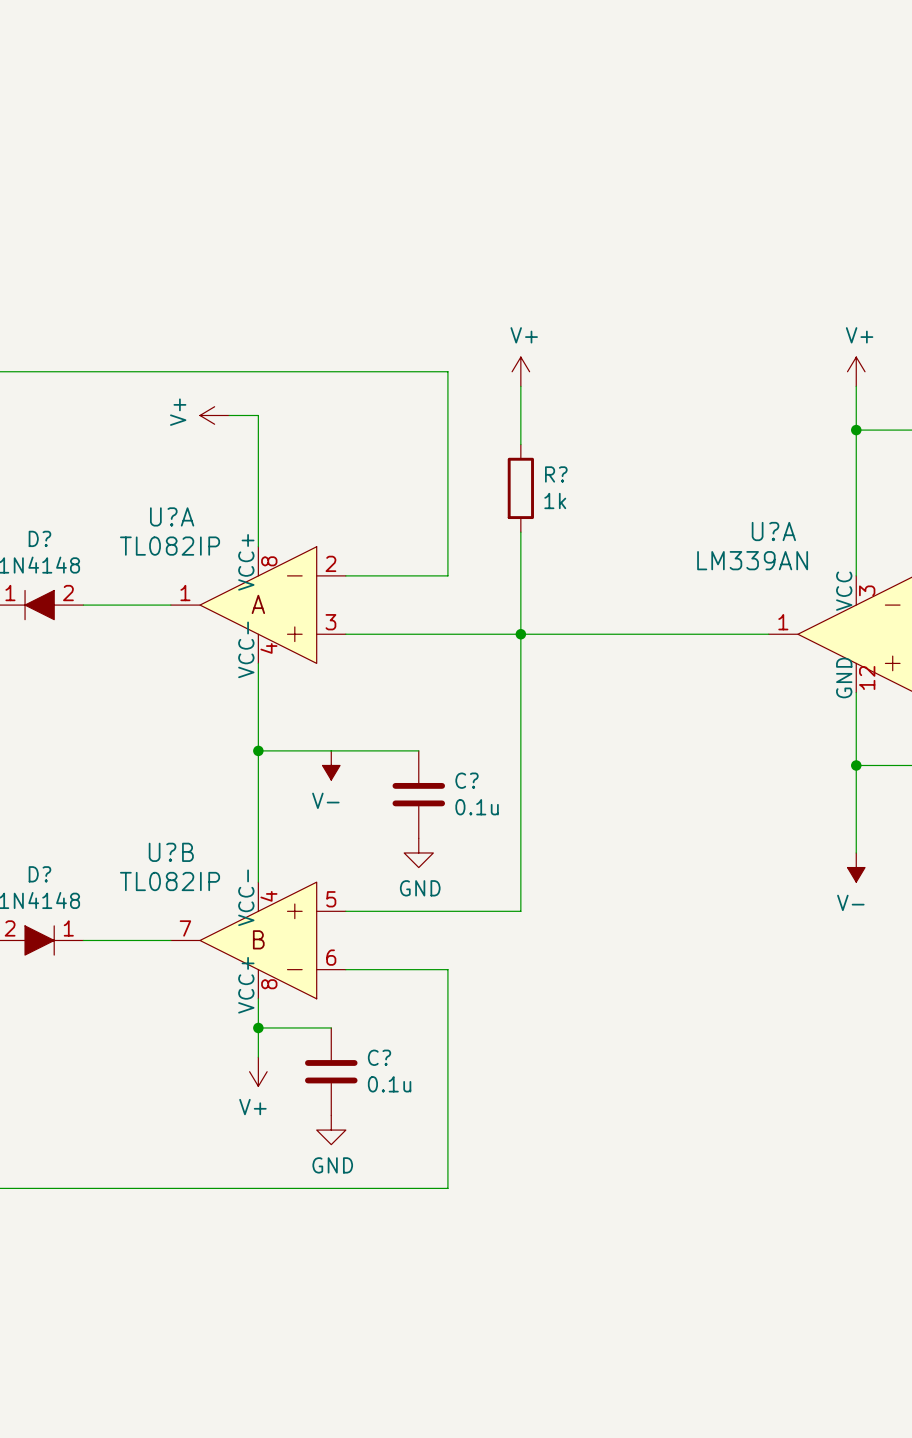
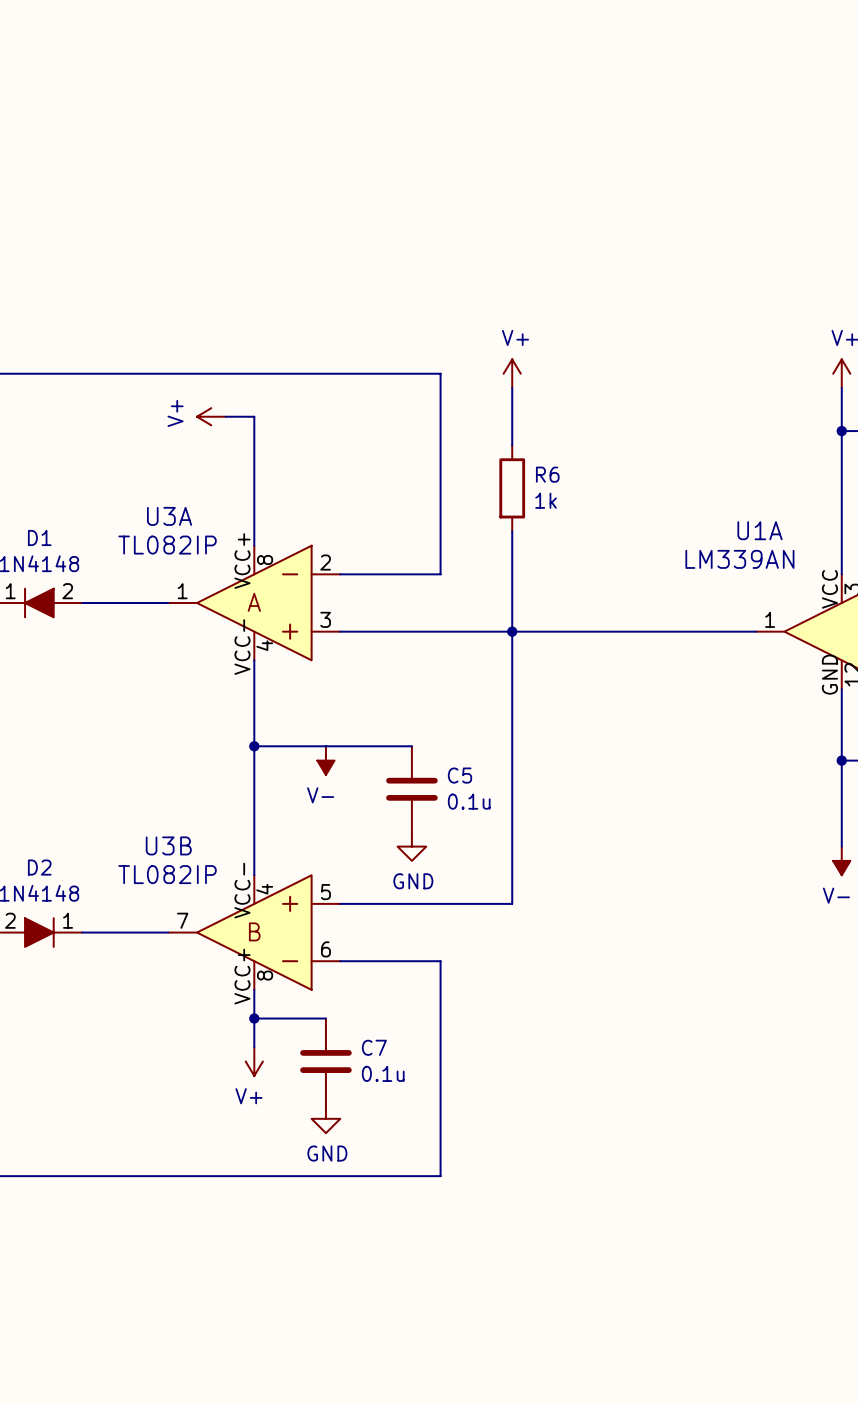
R? name: R? (556, 474) -> R6 (547, 474)
U?A name: U?A (172, 516) -> U3A (169, 516)
U?A name: U?A (773, 531) -> U1A (759, 530)
D? name: D? (39, 538) -> D1 (39, 537)
C? name: C? (467, 780) -> C5 (459, 775)
U?B name: U?B (171, 852) -> U3B (168, 845)
D? name: D? (39, 874) -> D2 (39, 867)
C? name: C? (379, 1057) -> C7 (374, 1047)

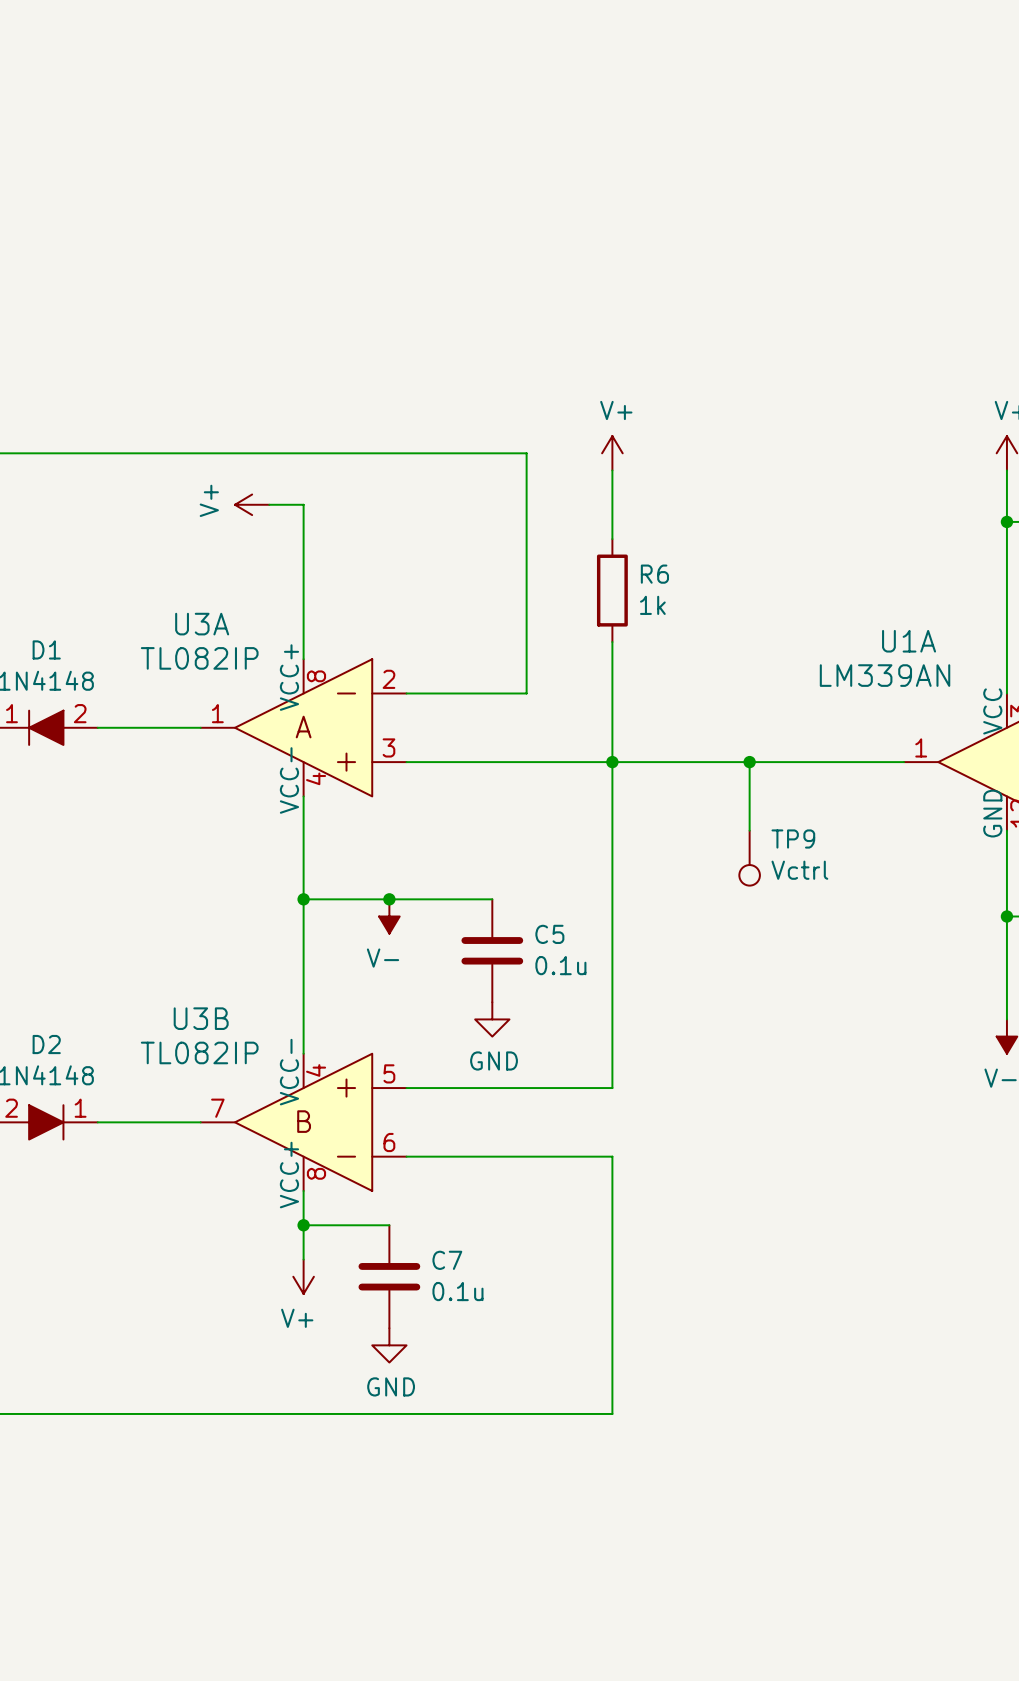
wire: none -> (749, 762) (749, 830)
junction: none -> (749, 762)
TP9: none -> Vctrl (749, 858)
junction: none -> (389, 899)
wire: (440, 961) (440, 1176) -> (526, 1156) (612, 1156) (612, 1413) (526, 1413)

